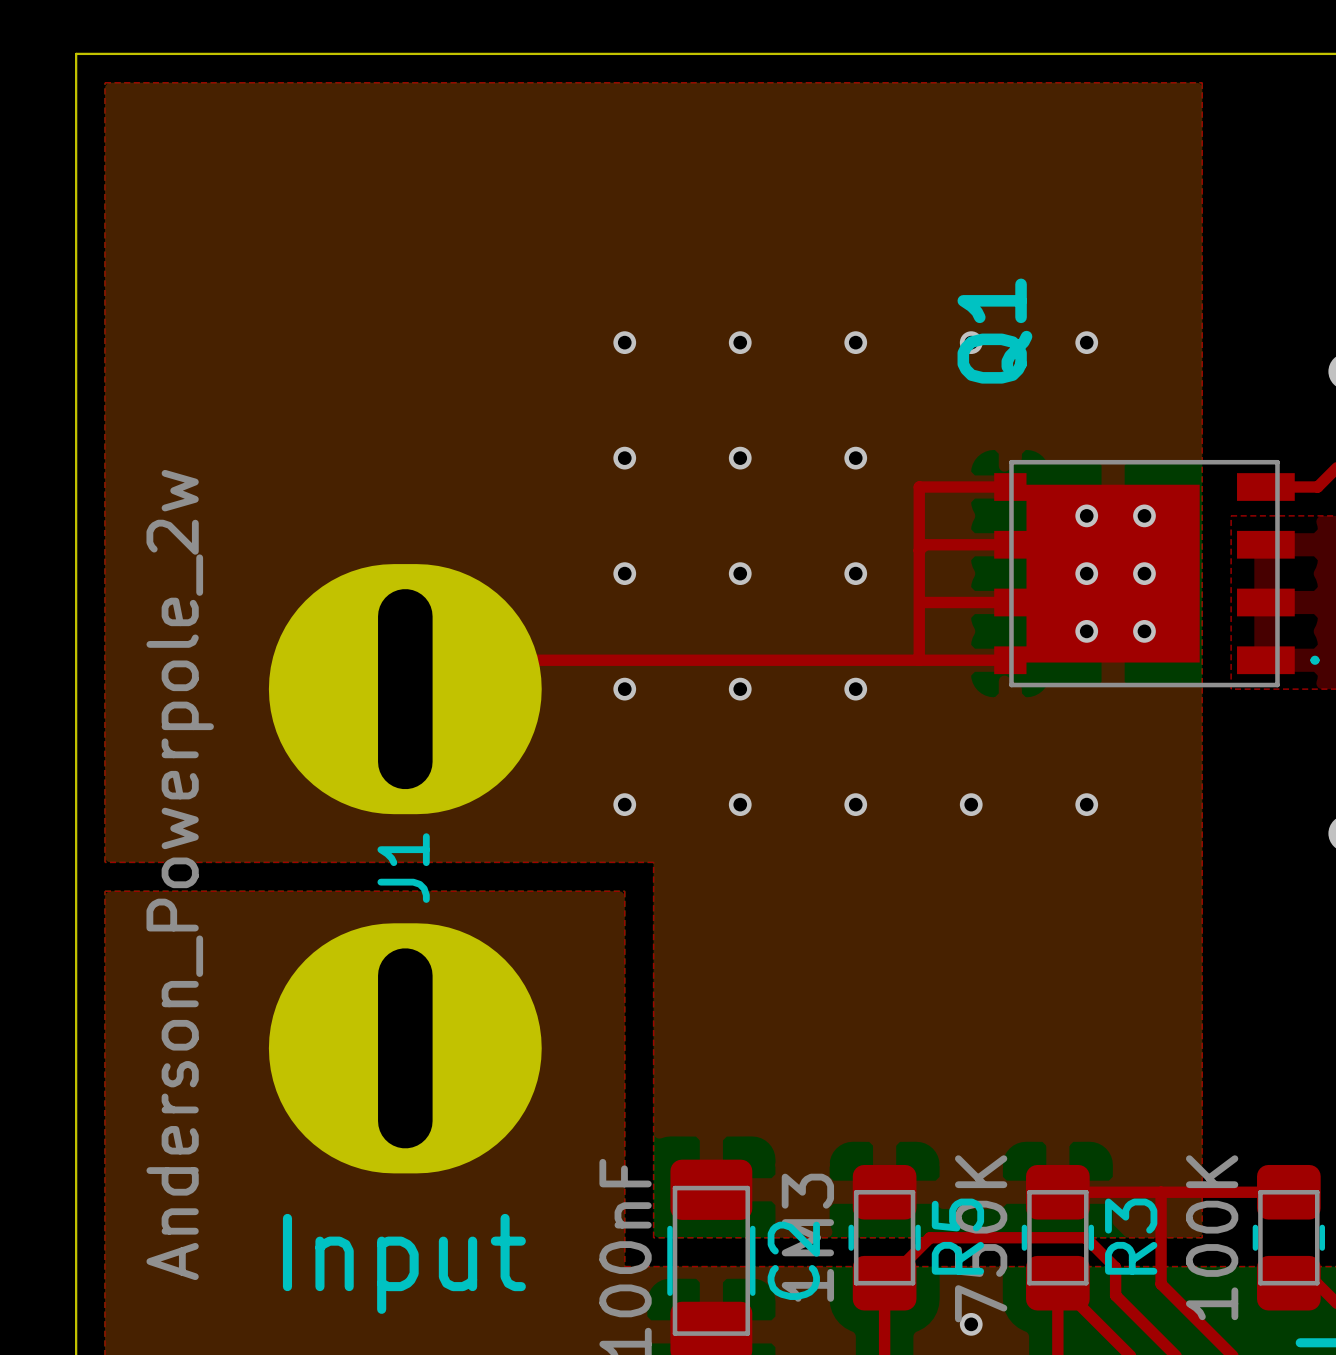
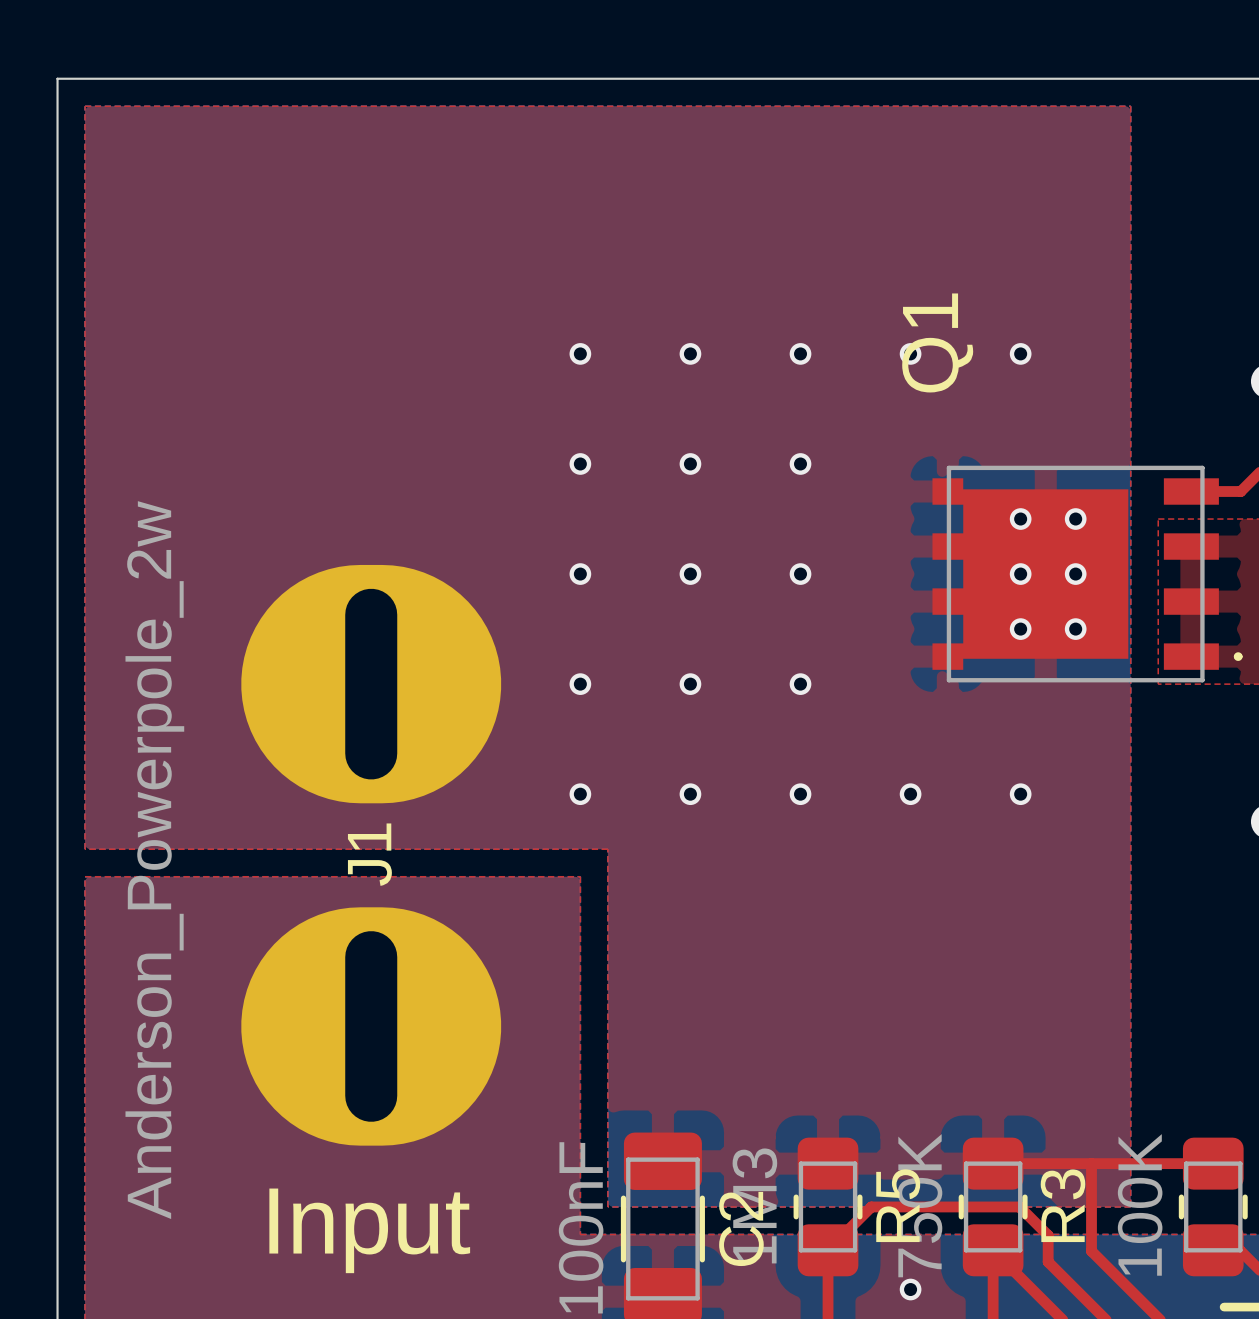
top track: (1010, 487) (919, 487) (919, 660) -> none
top track: (1010, 544) (925, 544) (919, 550) -> none
top track: (925, 602) (1010, 602) -> none
top track: (1010, 660) (434, 660) (405, 689) -> none

